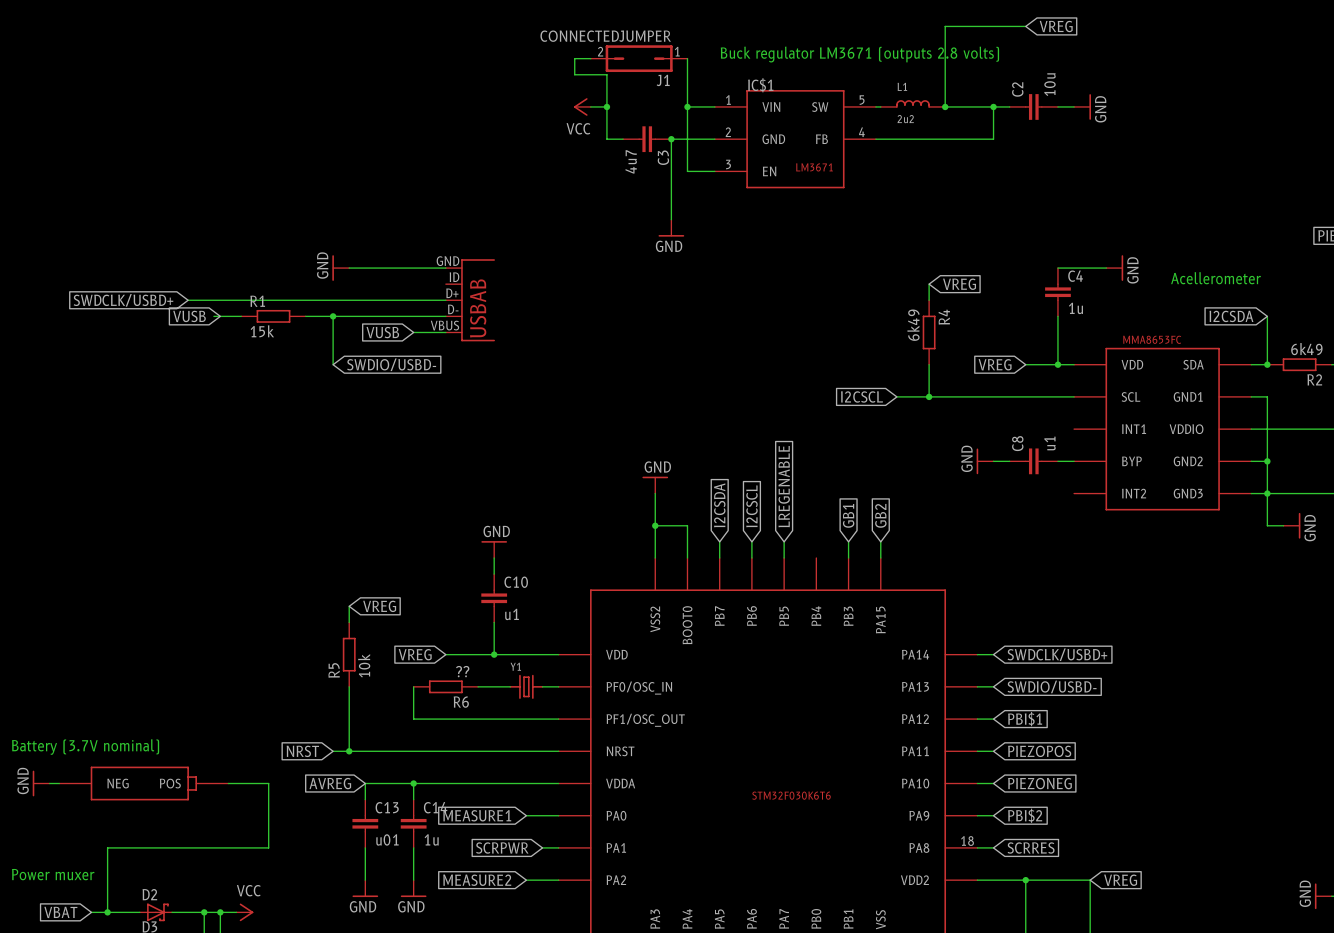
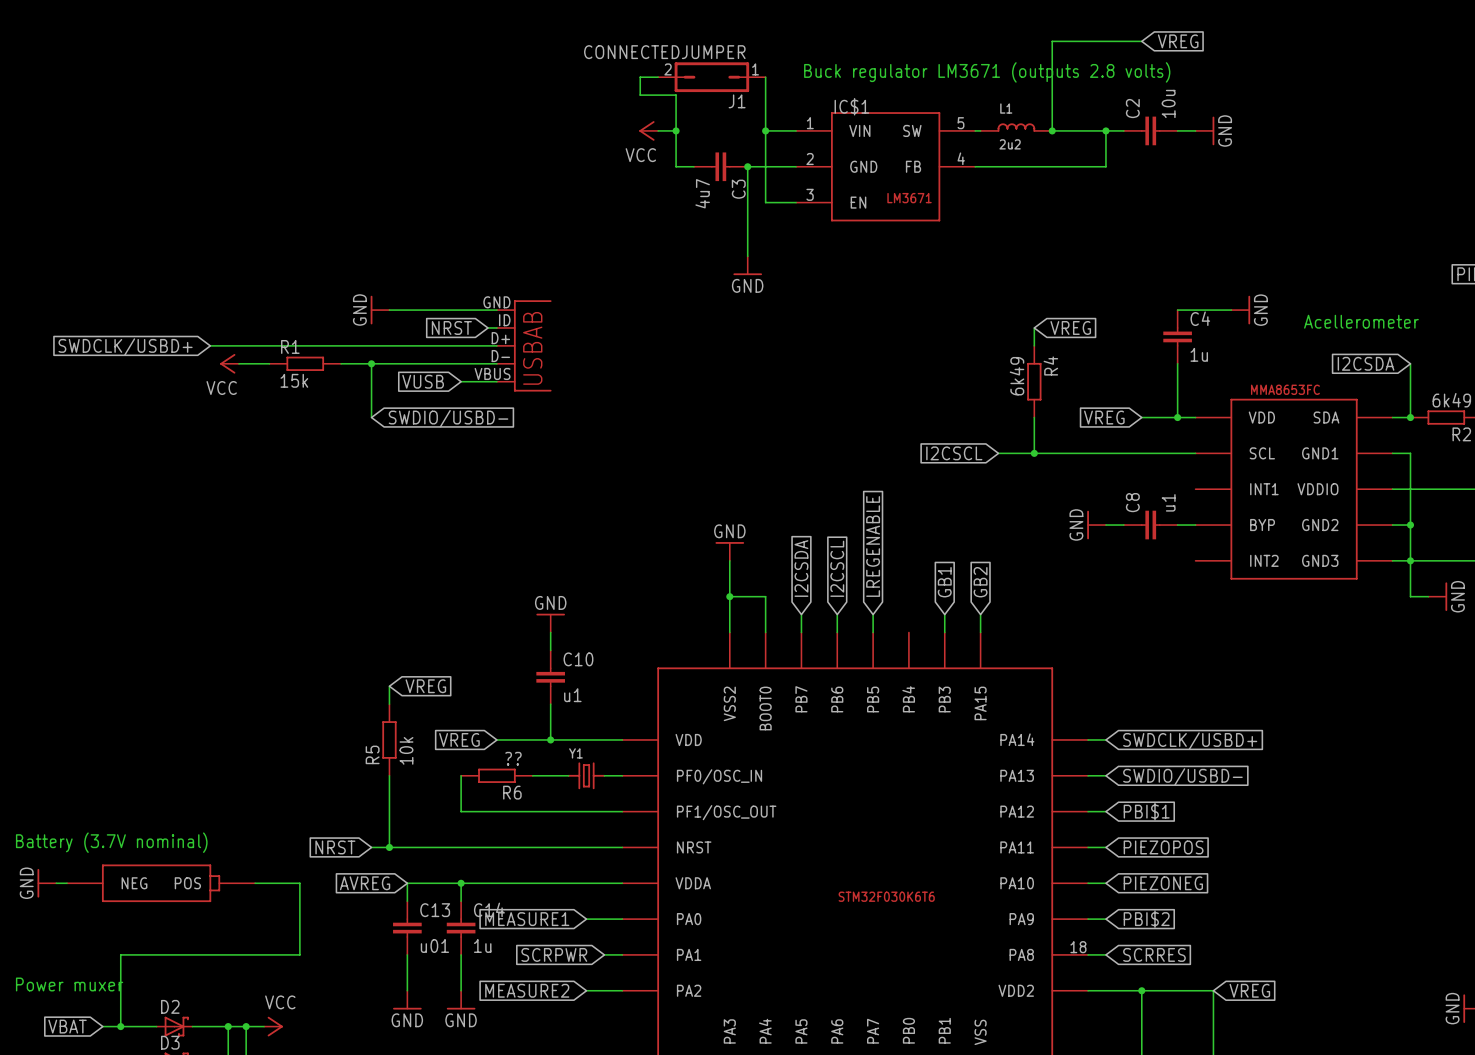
global label: none -> NRST (451, 327)
wire: none -> (487, 327) (496, 327)
global label: VUSB (189, 316) -> none
power symbol: none -> VCC (229, 363)

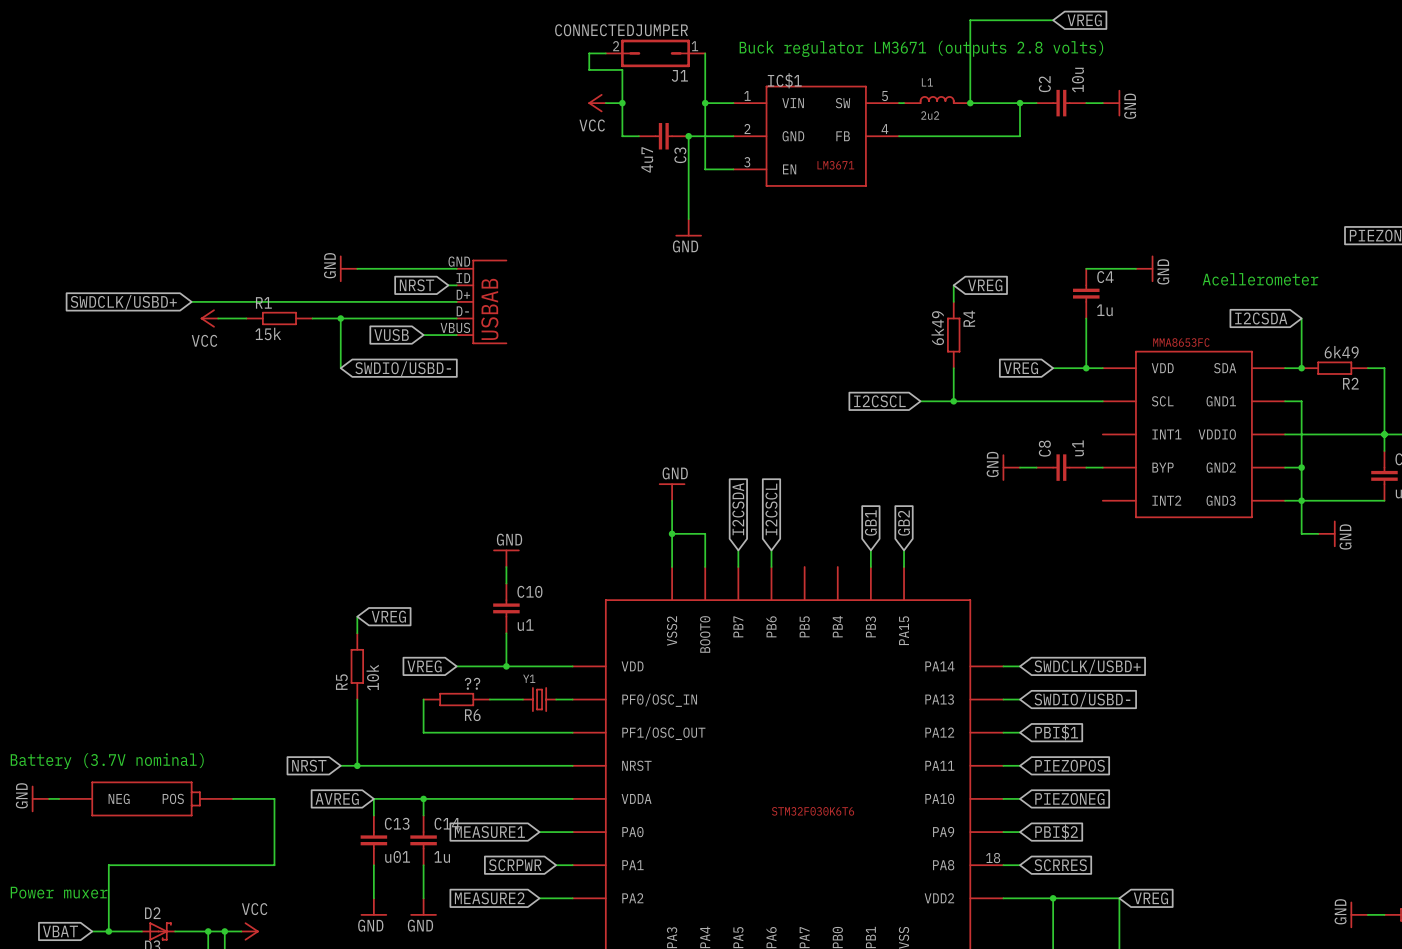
global label: LREGENABLE (873, 546) -> none
wire: (873, 614) (873, 632) -> none

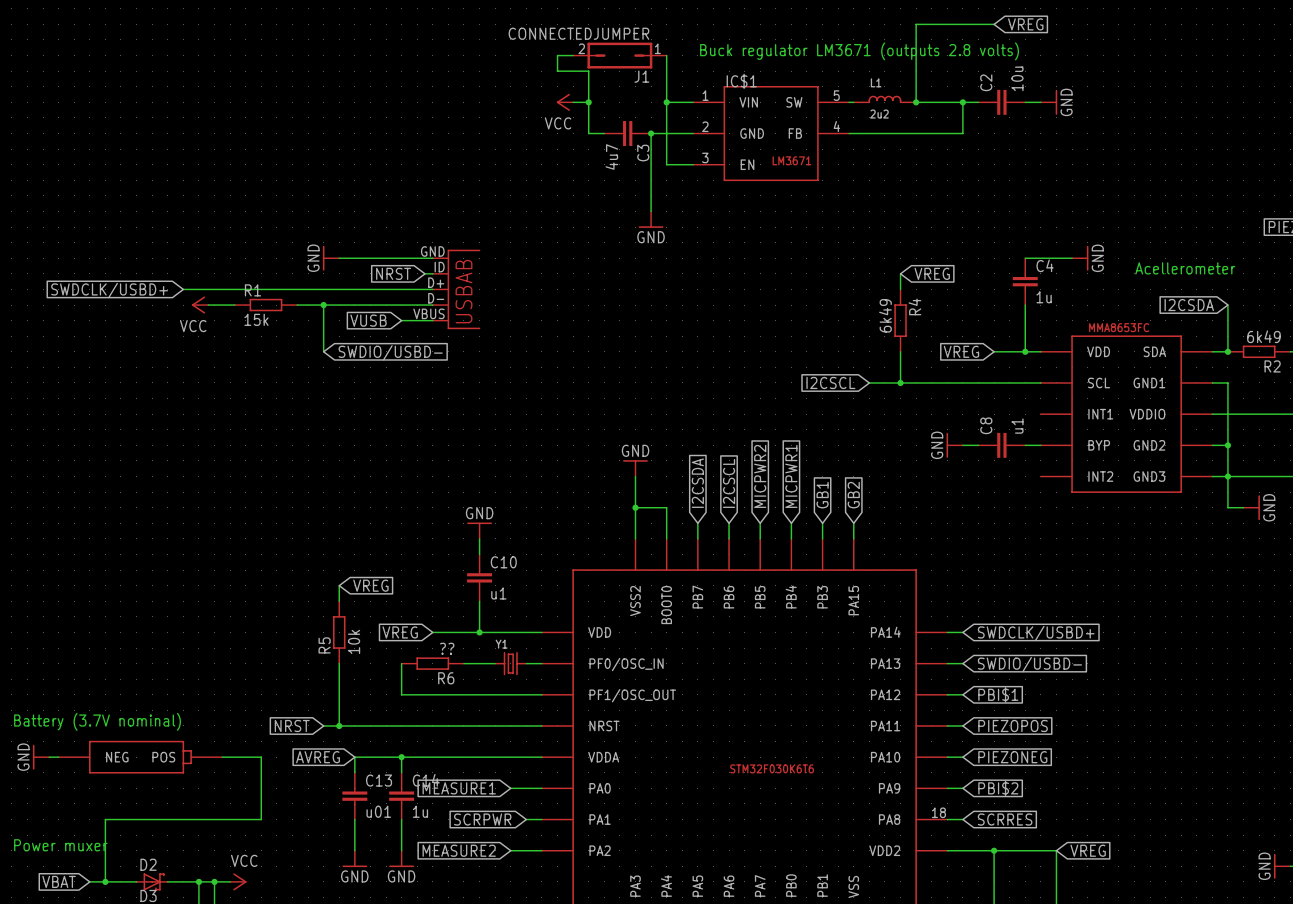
global label: none -> MICPWR1 (791, 476)
global label: none -> MICPWR2 (760, 476)
wire: none -> (760, 523) (760, 538)
wire: none -> (791, 523) (791, 538)

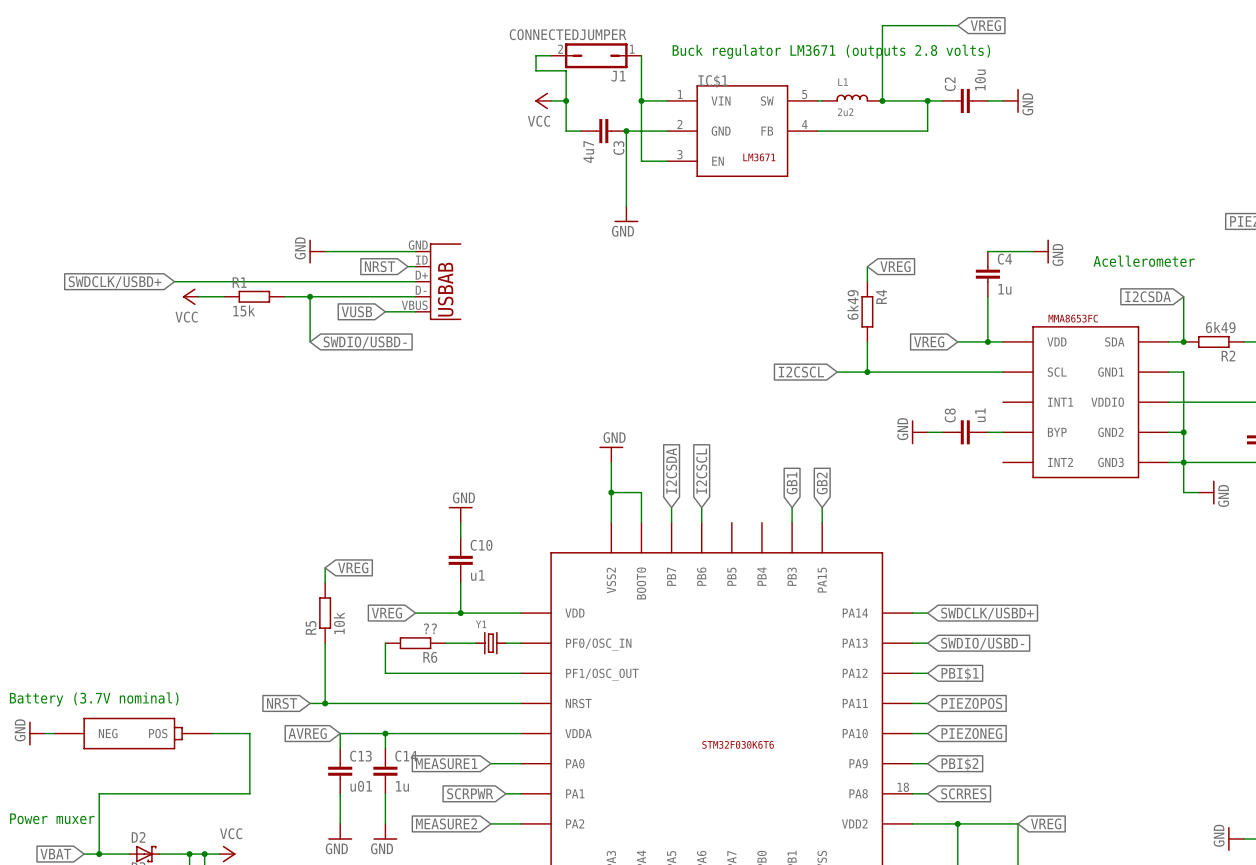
global label: MICPWR2 (760, 476) -> none
global label: MICPWR1 (791, 476) -> none
wire: (760, 523) (760, 538) -> none
wire: (791, 523) (791, 538) -> none

